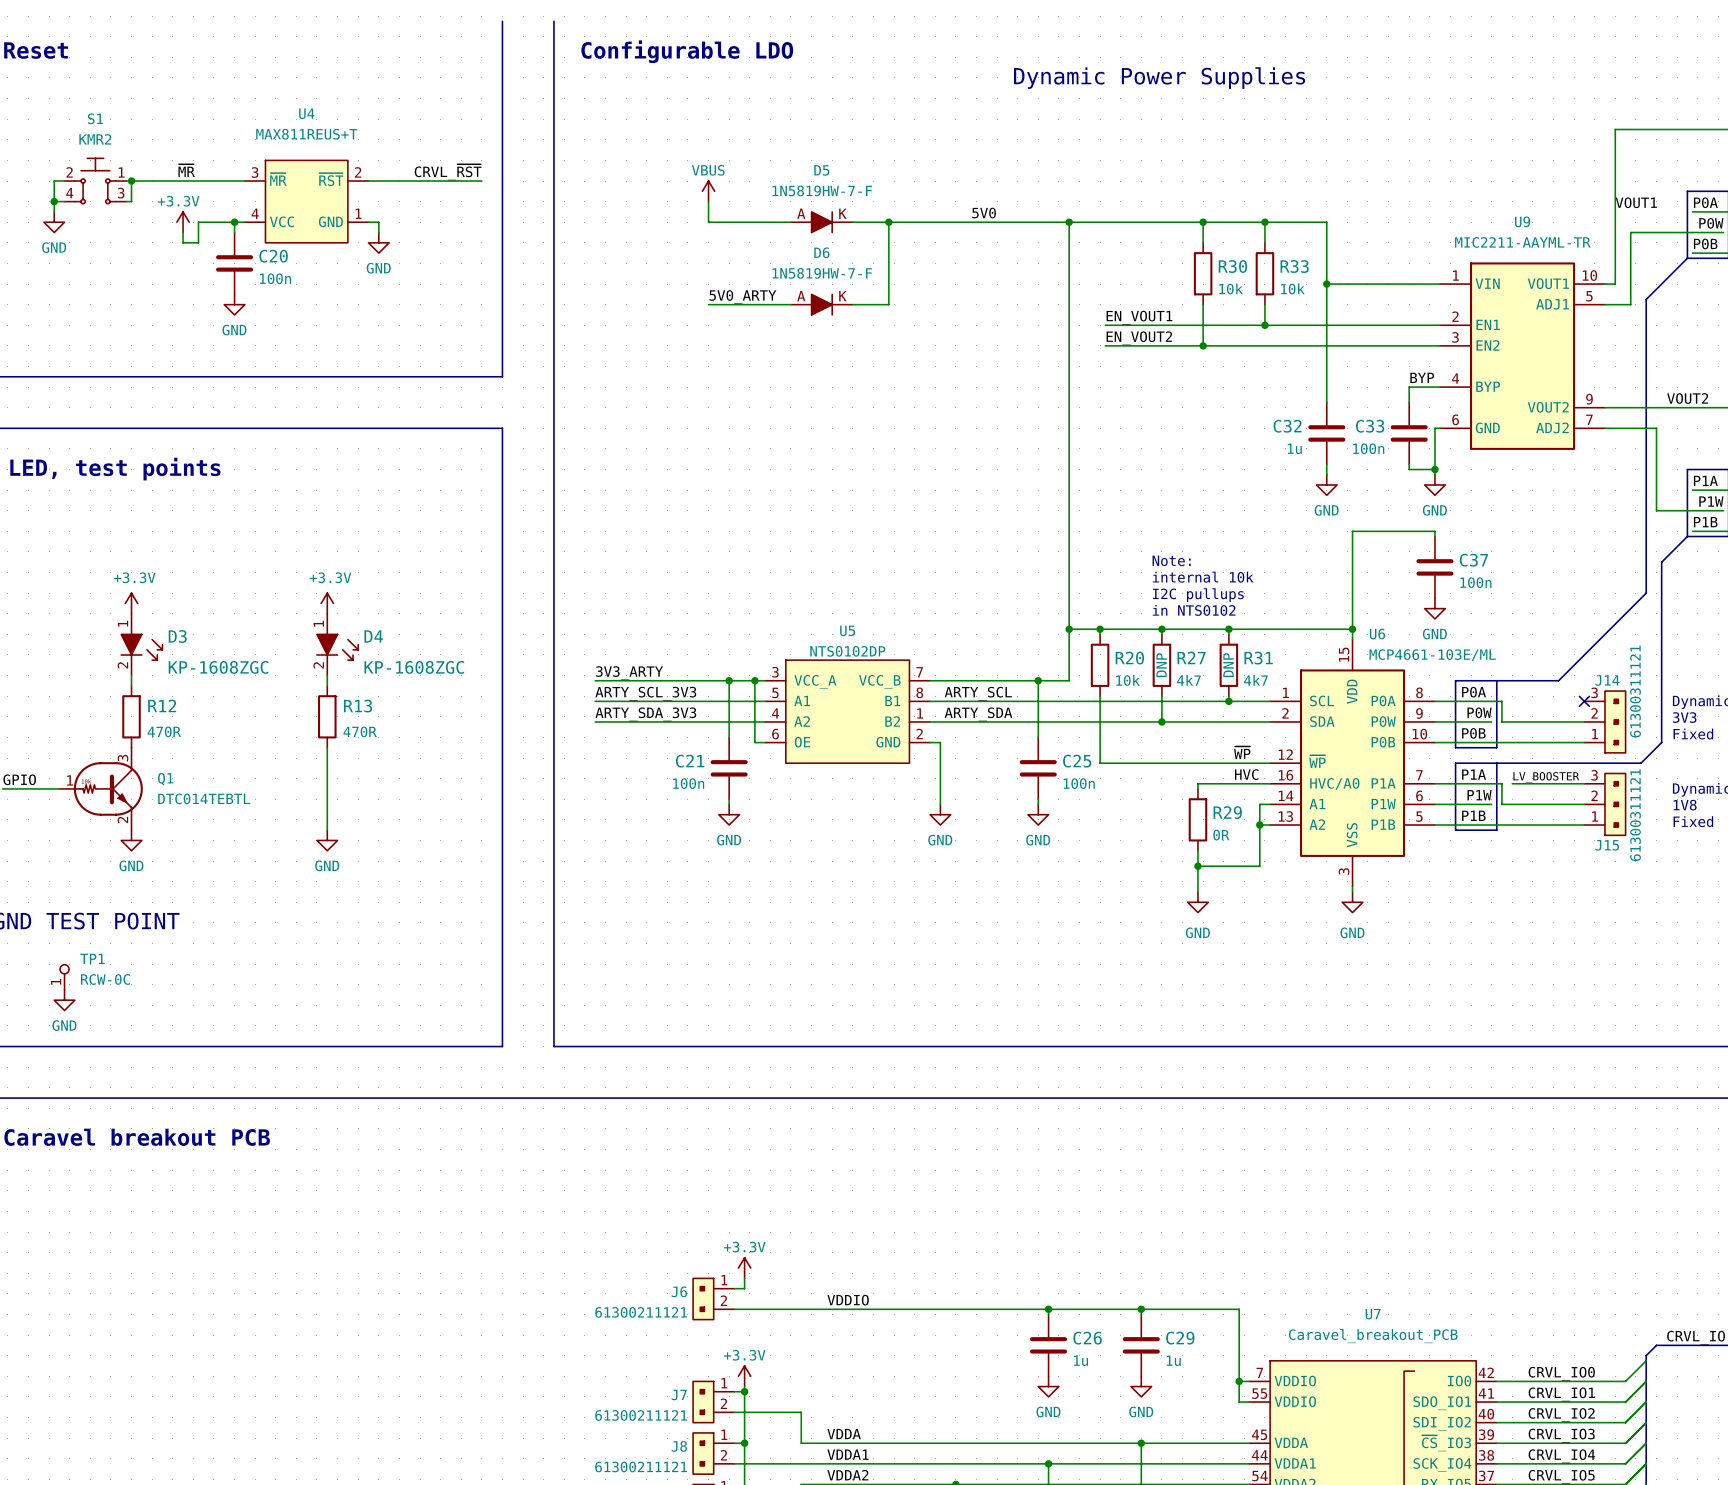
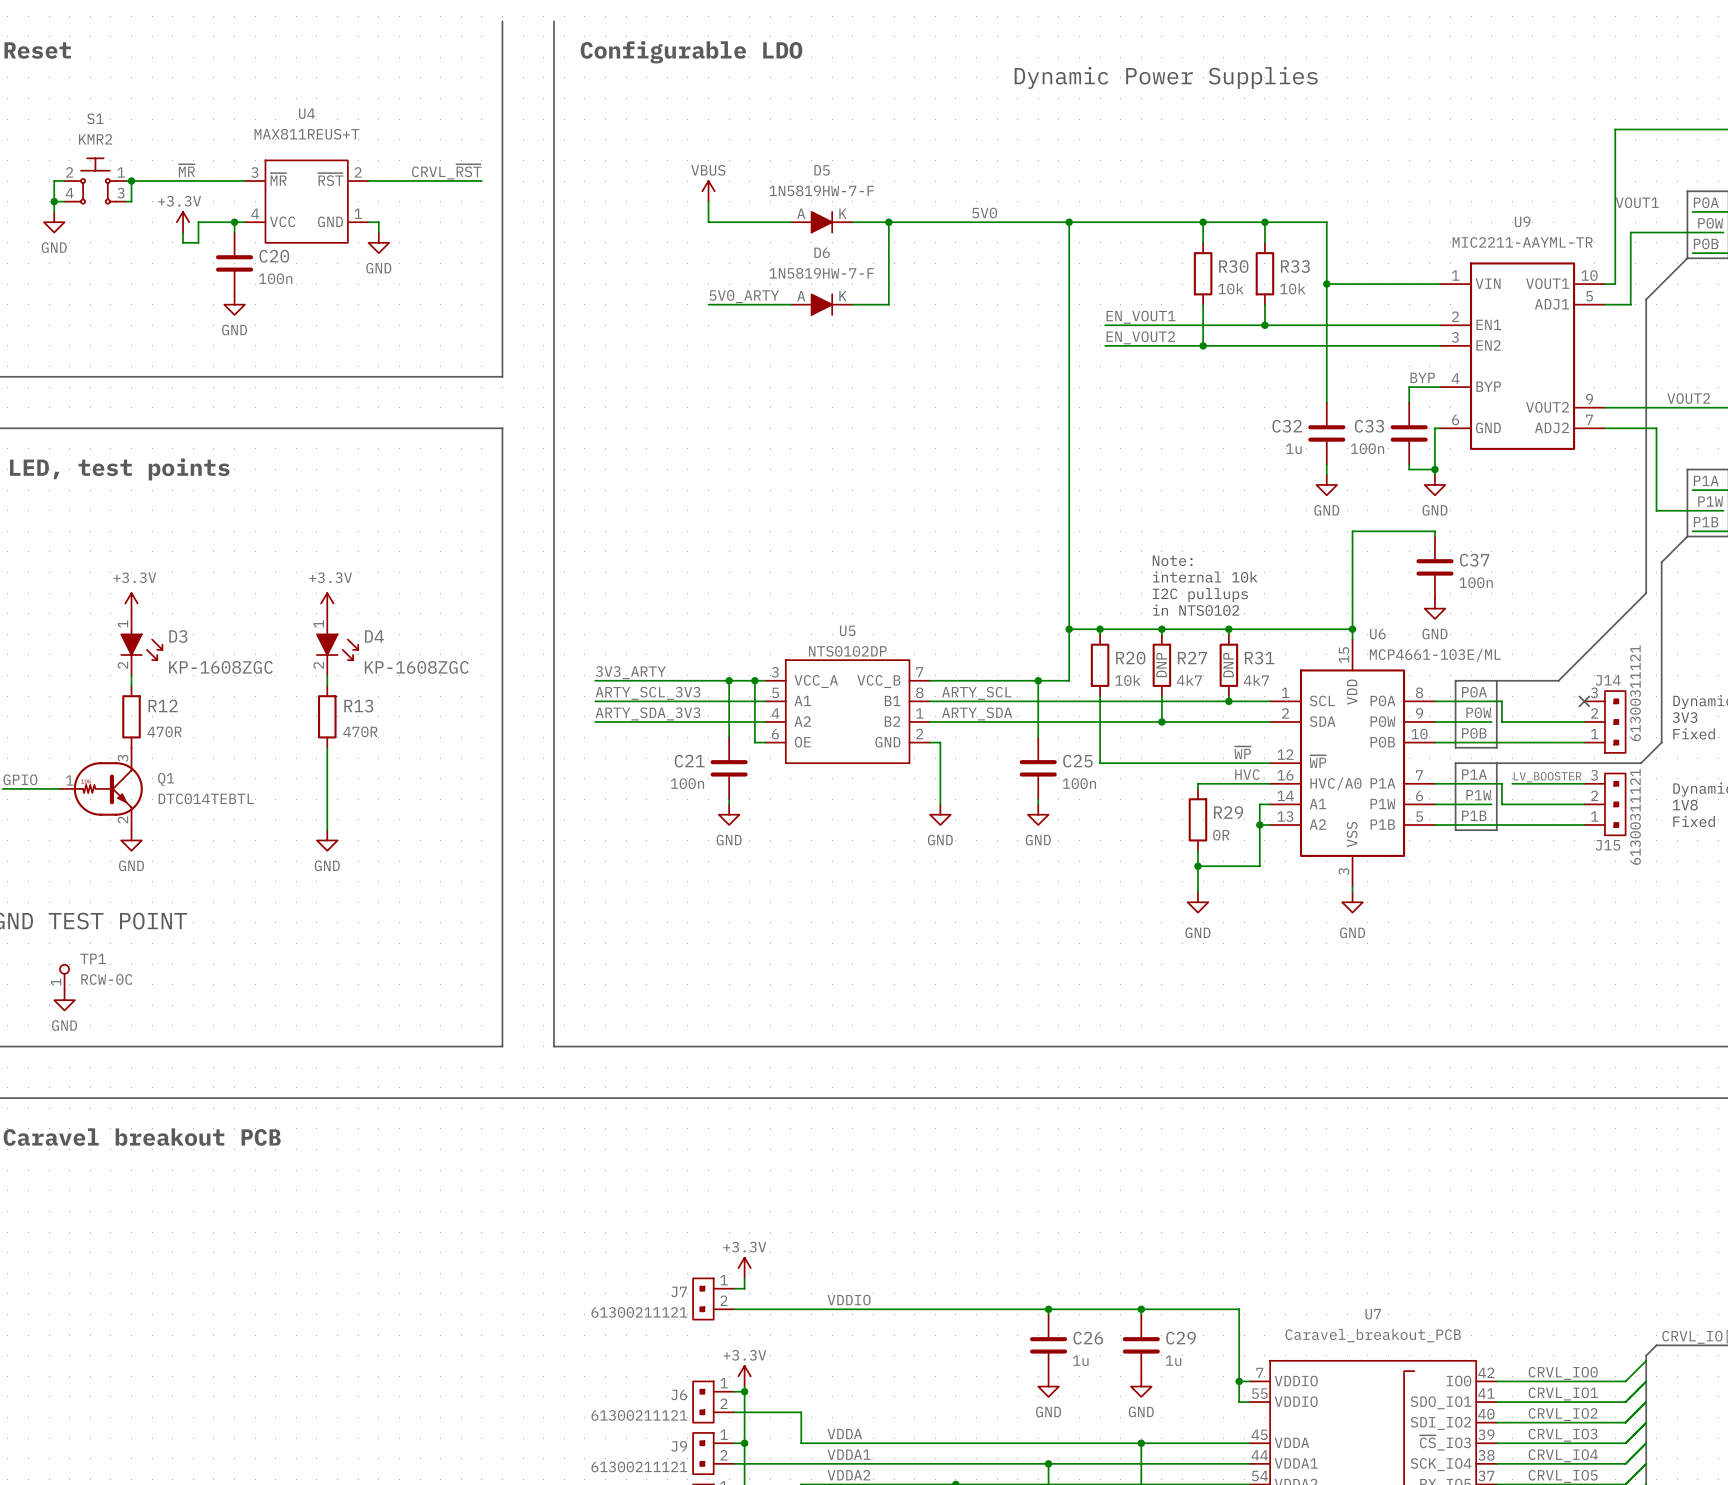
J6 name: J6 (679, 1291) -> J7 (679, 1291)
J7 name: J7 (679, 1394) -> J6 (679, 1394)
J8 name: J8 (679, 1446) -> J9 (679, 1446)

